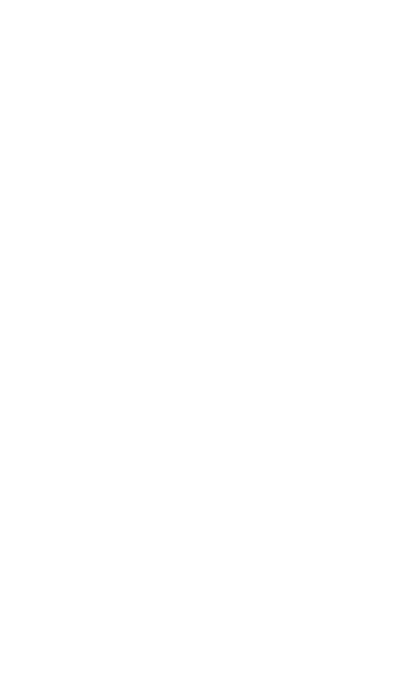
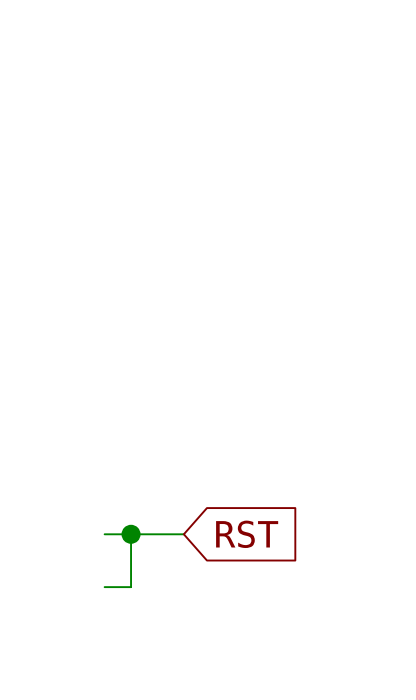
wire: none -> (104, 534) (183, 534)
wire: none -> (131, 534) (131, 587) (104, 587)
junction: none -> (131, 534)
global label: none -> RST (247, 534)

